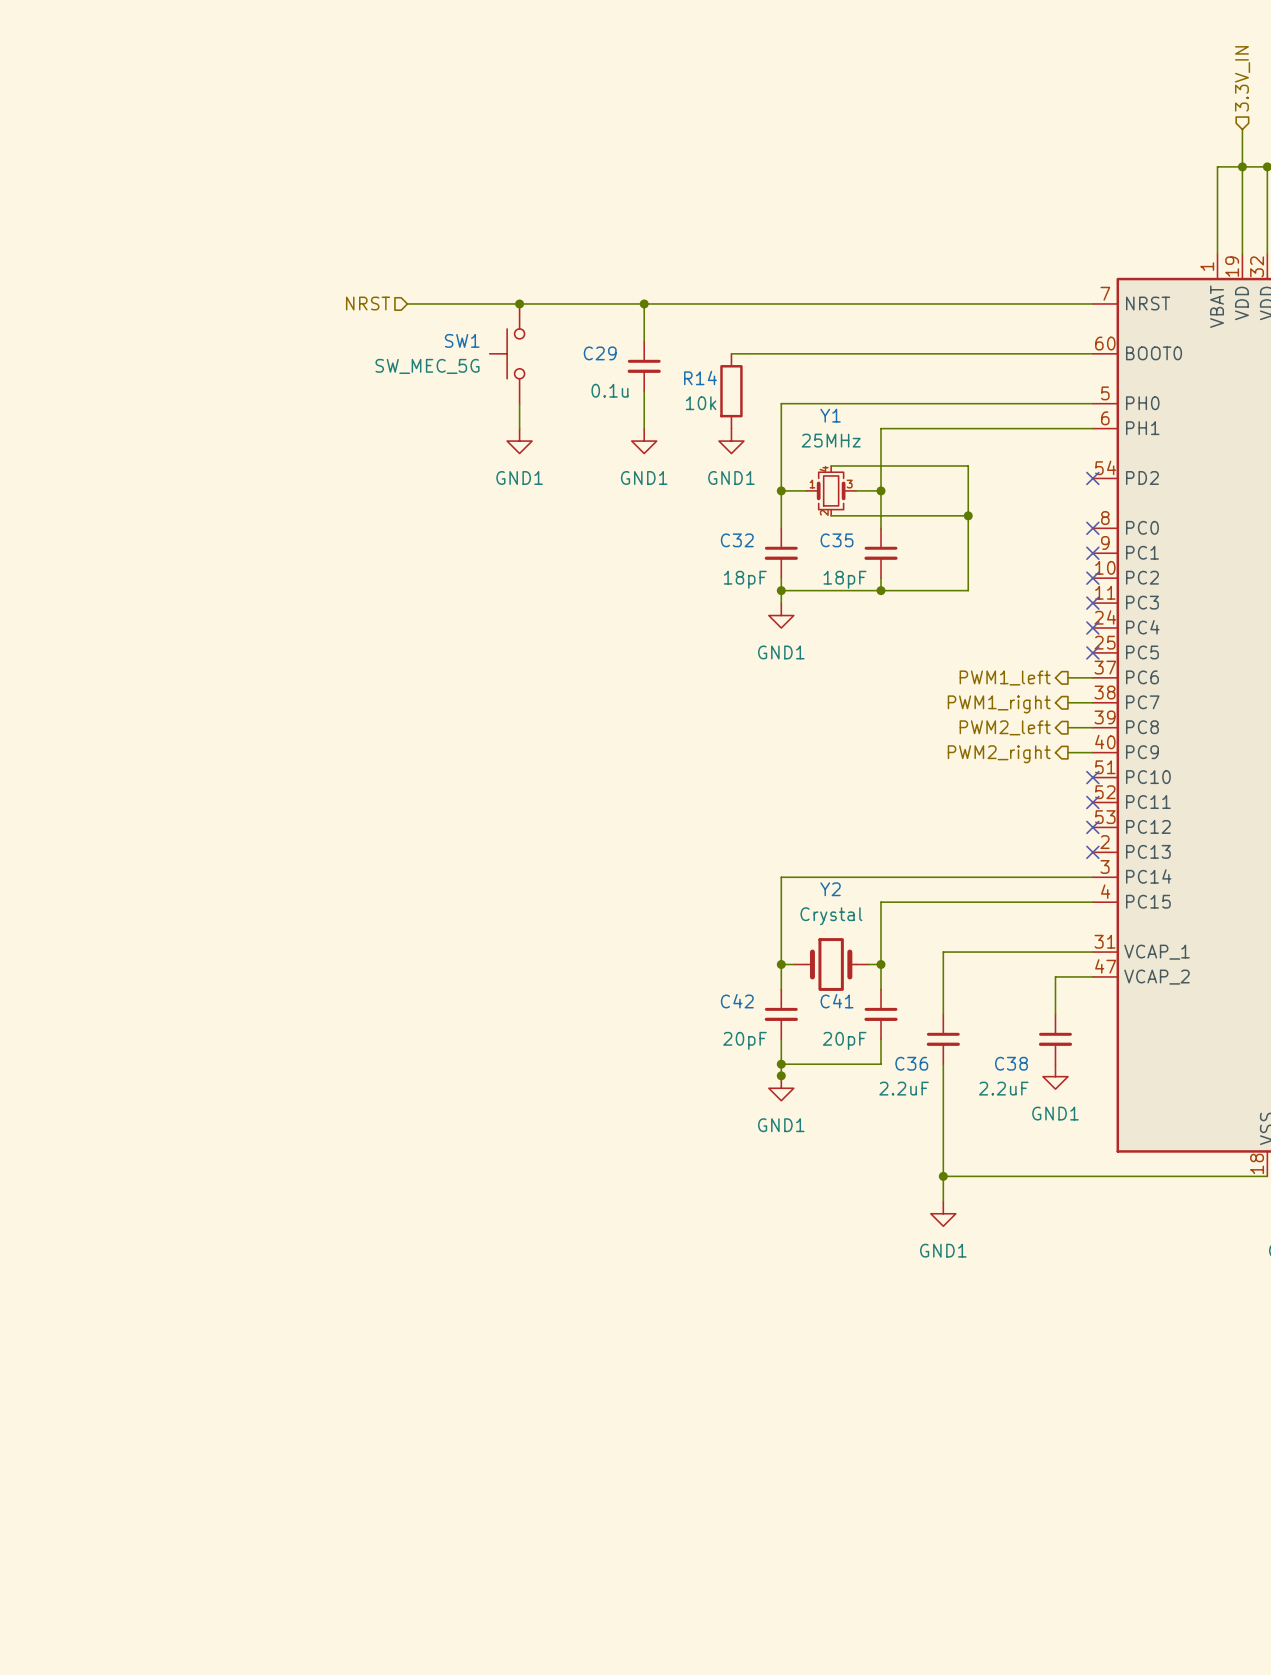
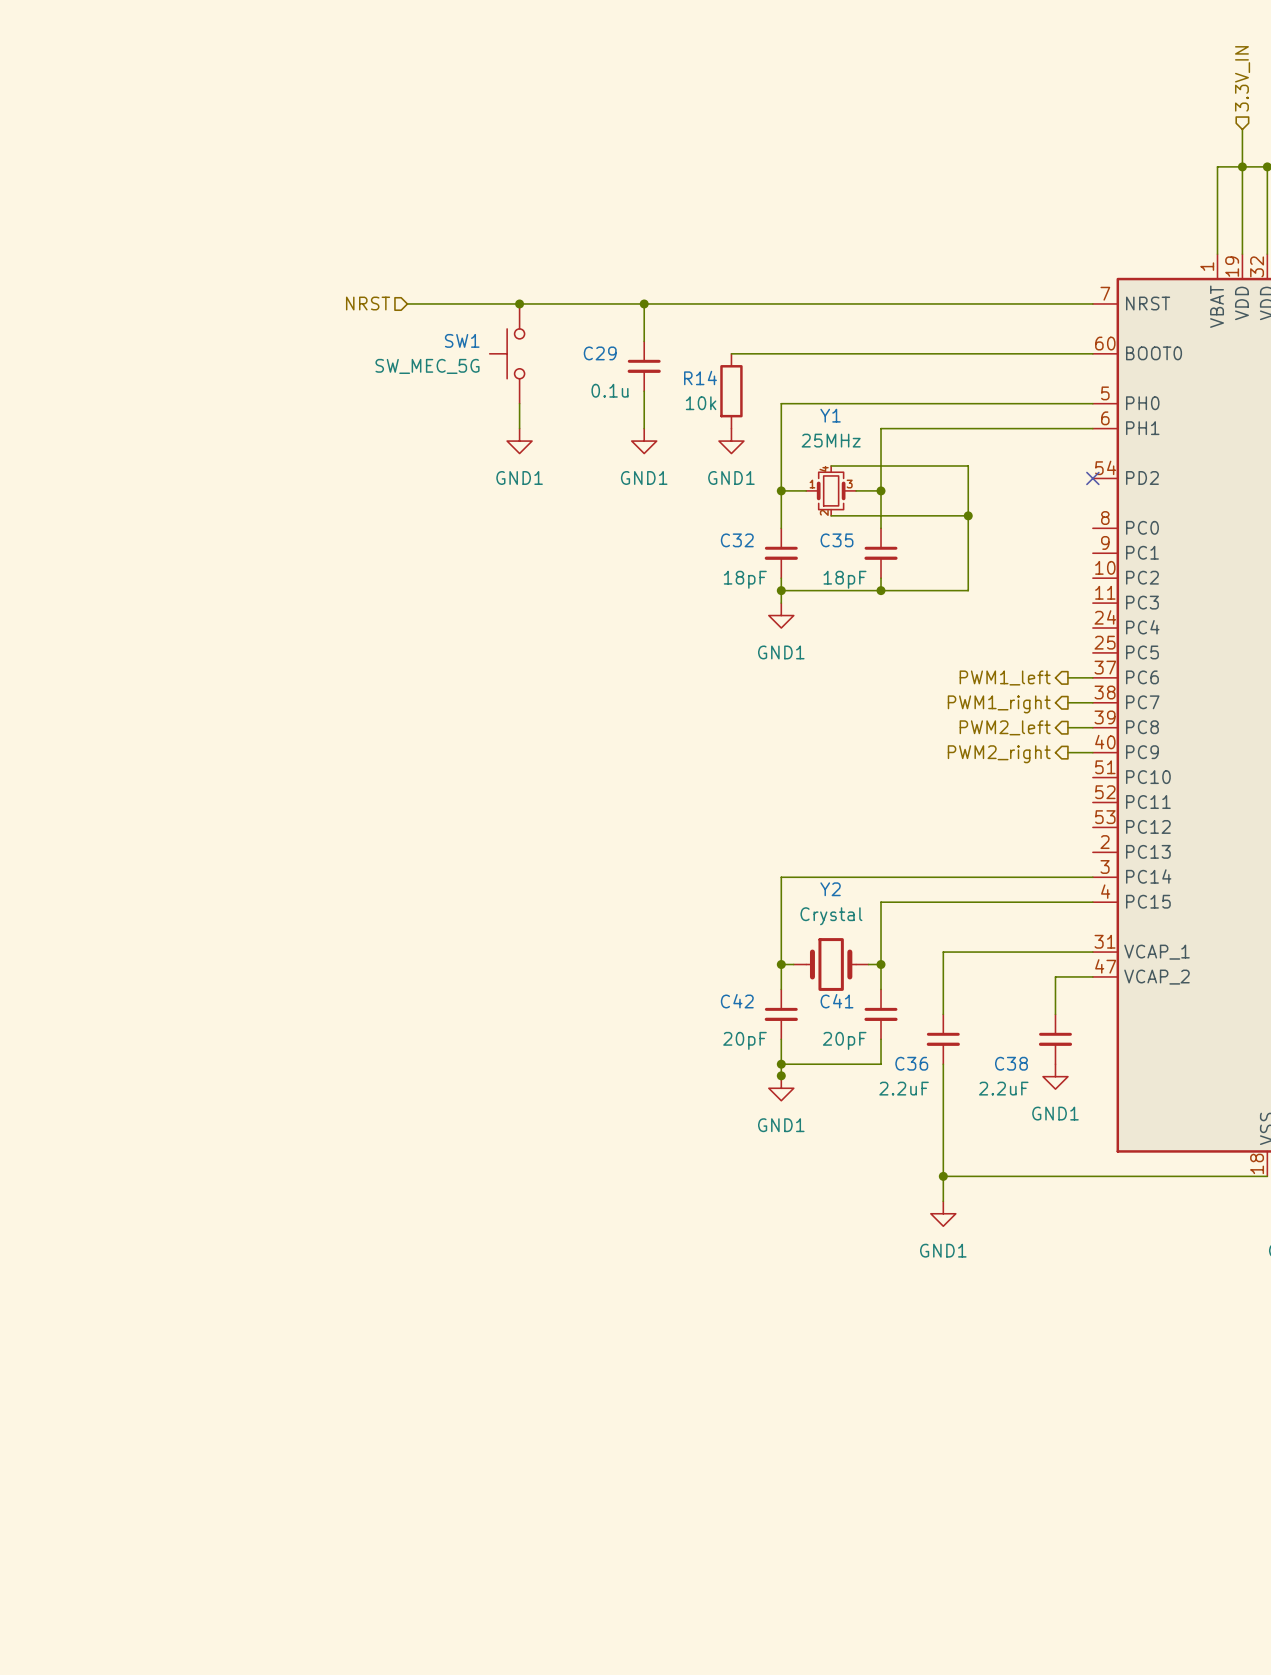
no-connect mark: (1092, 528) -> none
no-connect mark: (1092, 553) -> none
no-connect mark: (1092, 578) -> none
no-connect mark: (1092, 603) -> none
no-connect mark: (1092, 628) -> none
no-connect mark: (1092, 652) -> none
no-connect mark: (1092, 777) -> none
no-connect mark: (1092, 802) -> none
no-connect mark: (1092, 827) -> none
no-connect mark: (1092, 852) -> none

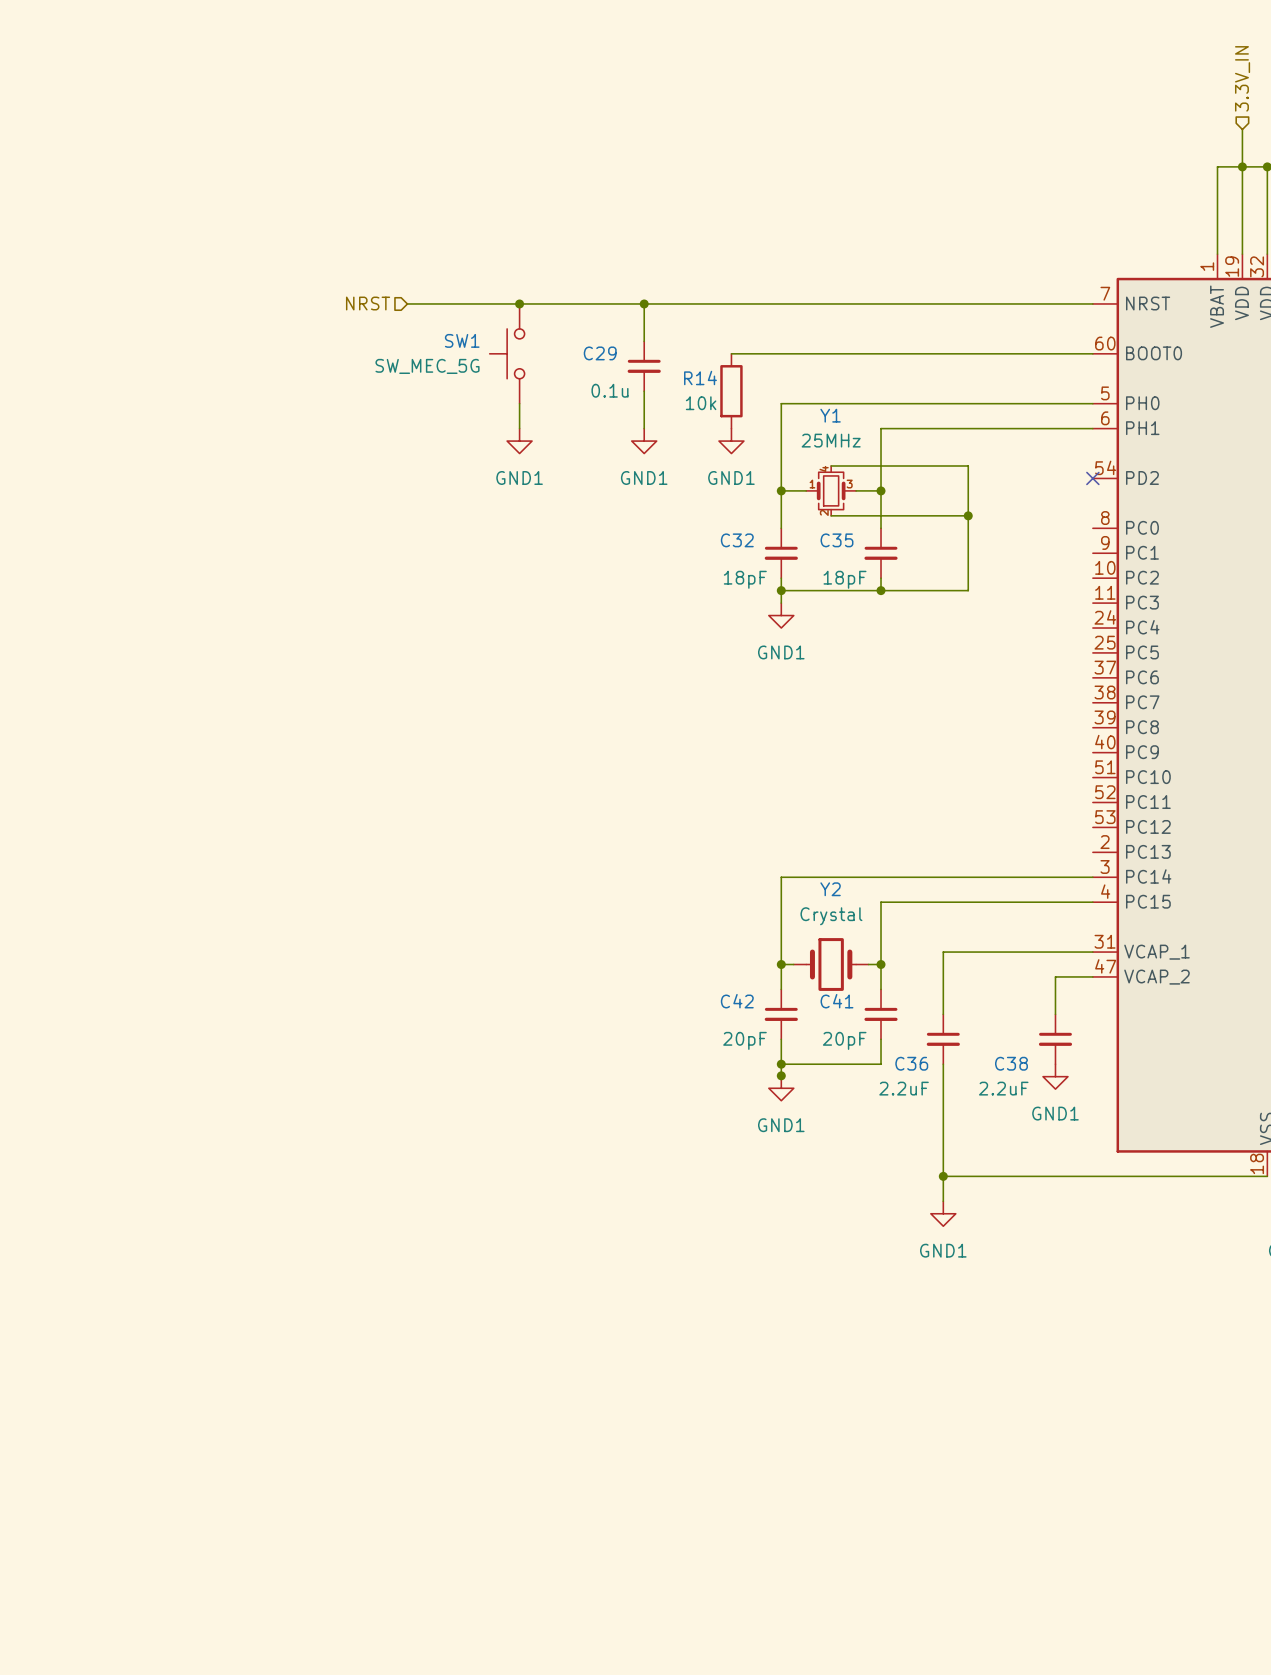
hierarchical label: PWM1_left (1005, 677) -> none
wire: (1067, 677) (1092, 677) -> none
wire: (1067, 702) (1092, 702) -> none
hierarchical label: PWM1_right (999, 704) -> none
hierarchical label: PWM2_left (1005, 727) -> none
wire: (1067, 727) (1092, 727) -> none
wire: (1067, 752) (1092, 752) -> none
hierarchical label: PWM2_right (999, 754) -> none

